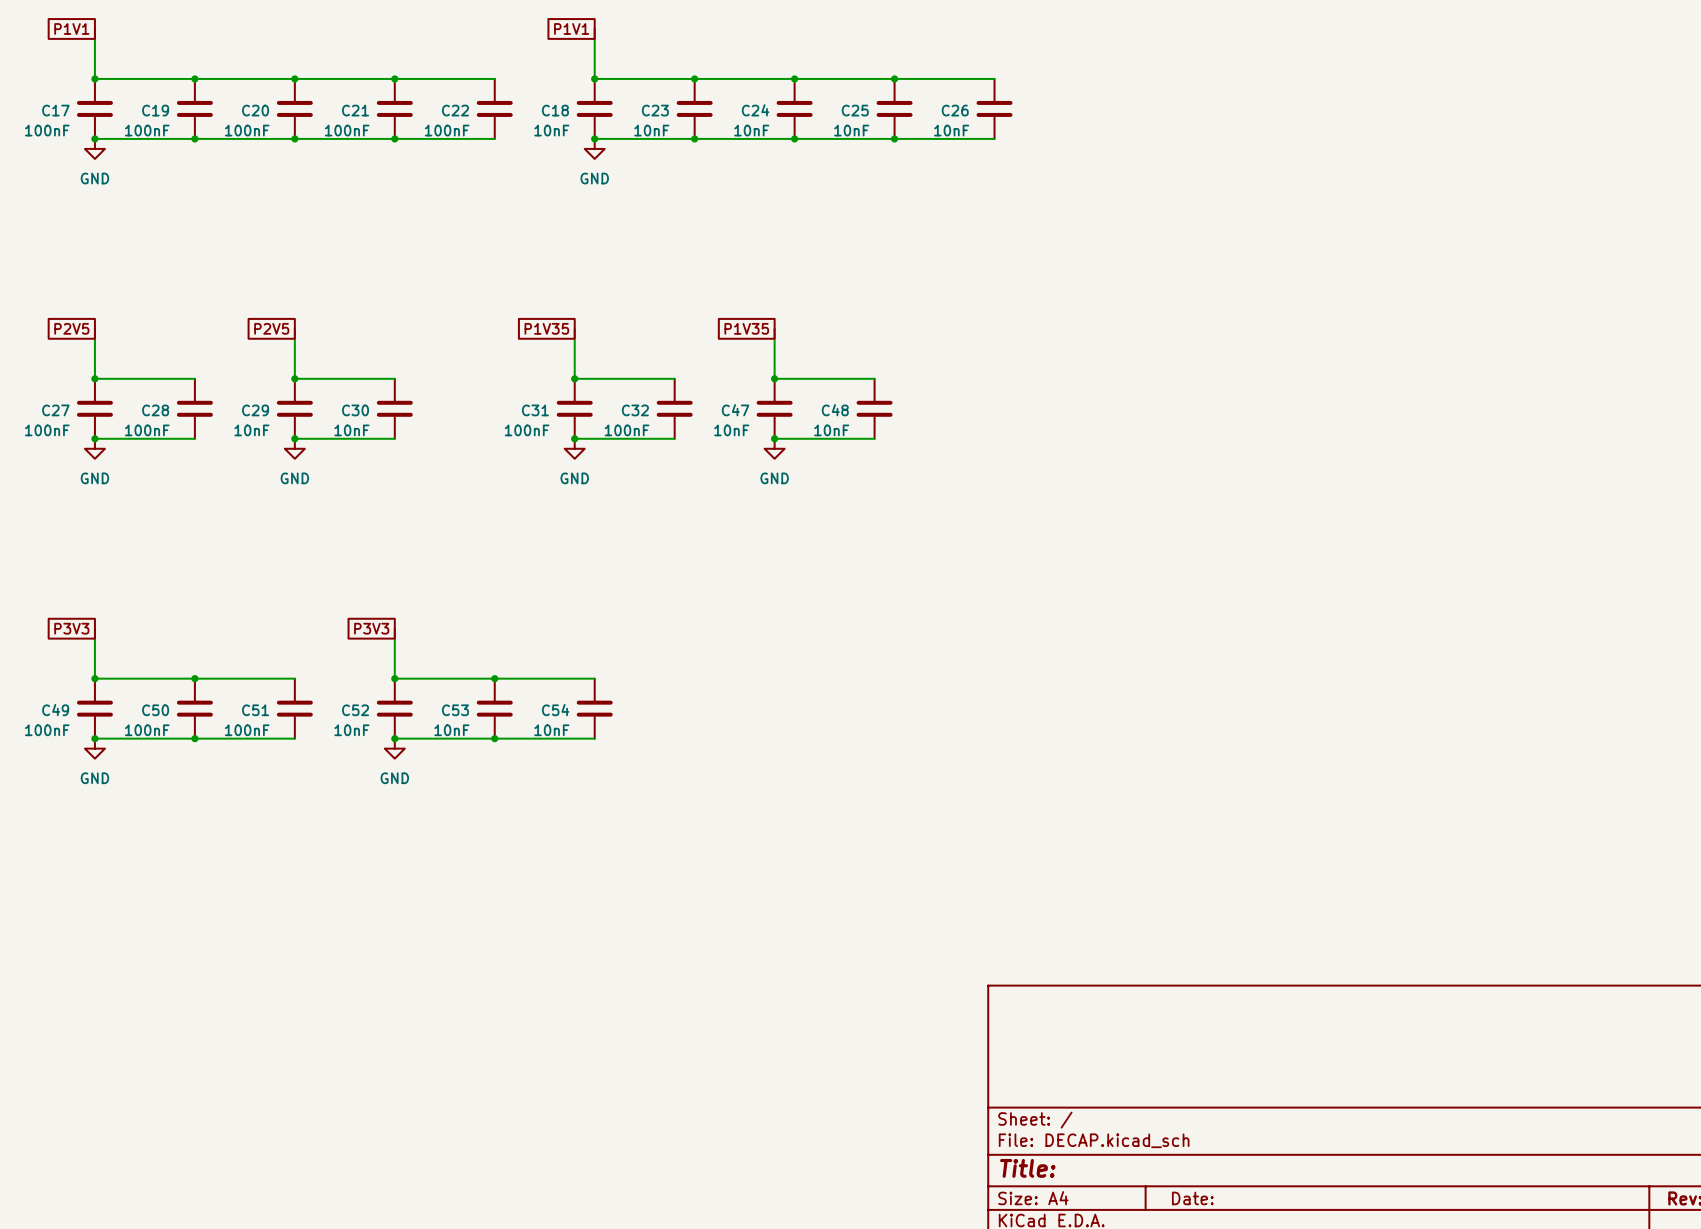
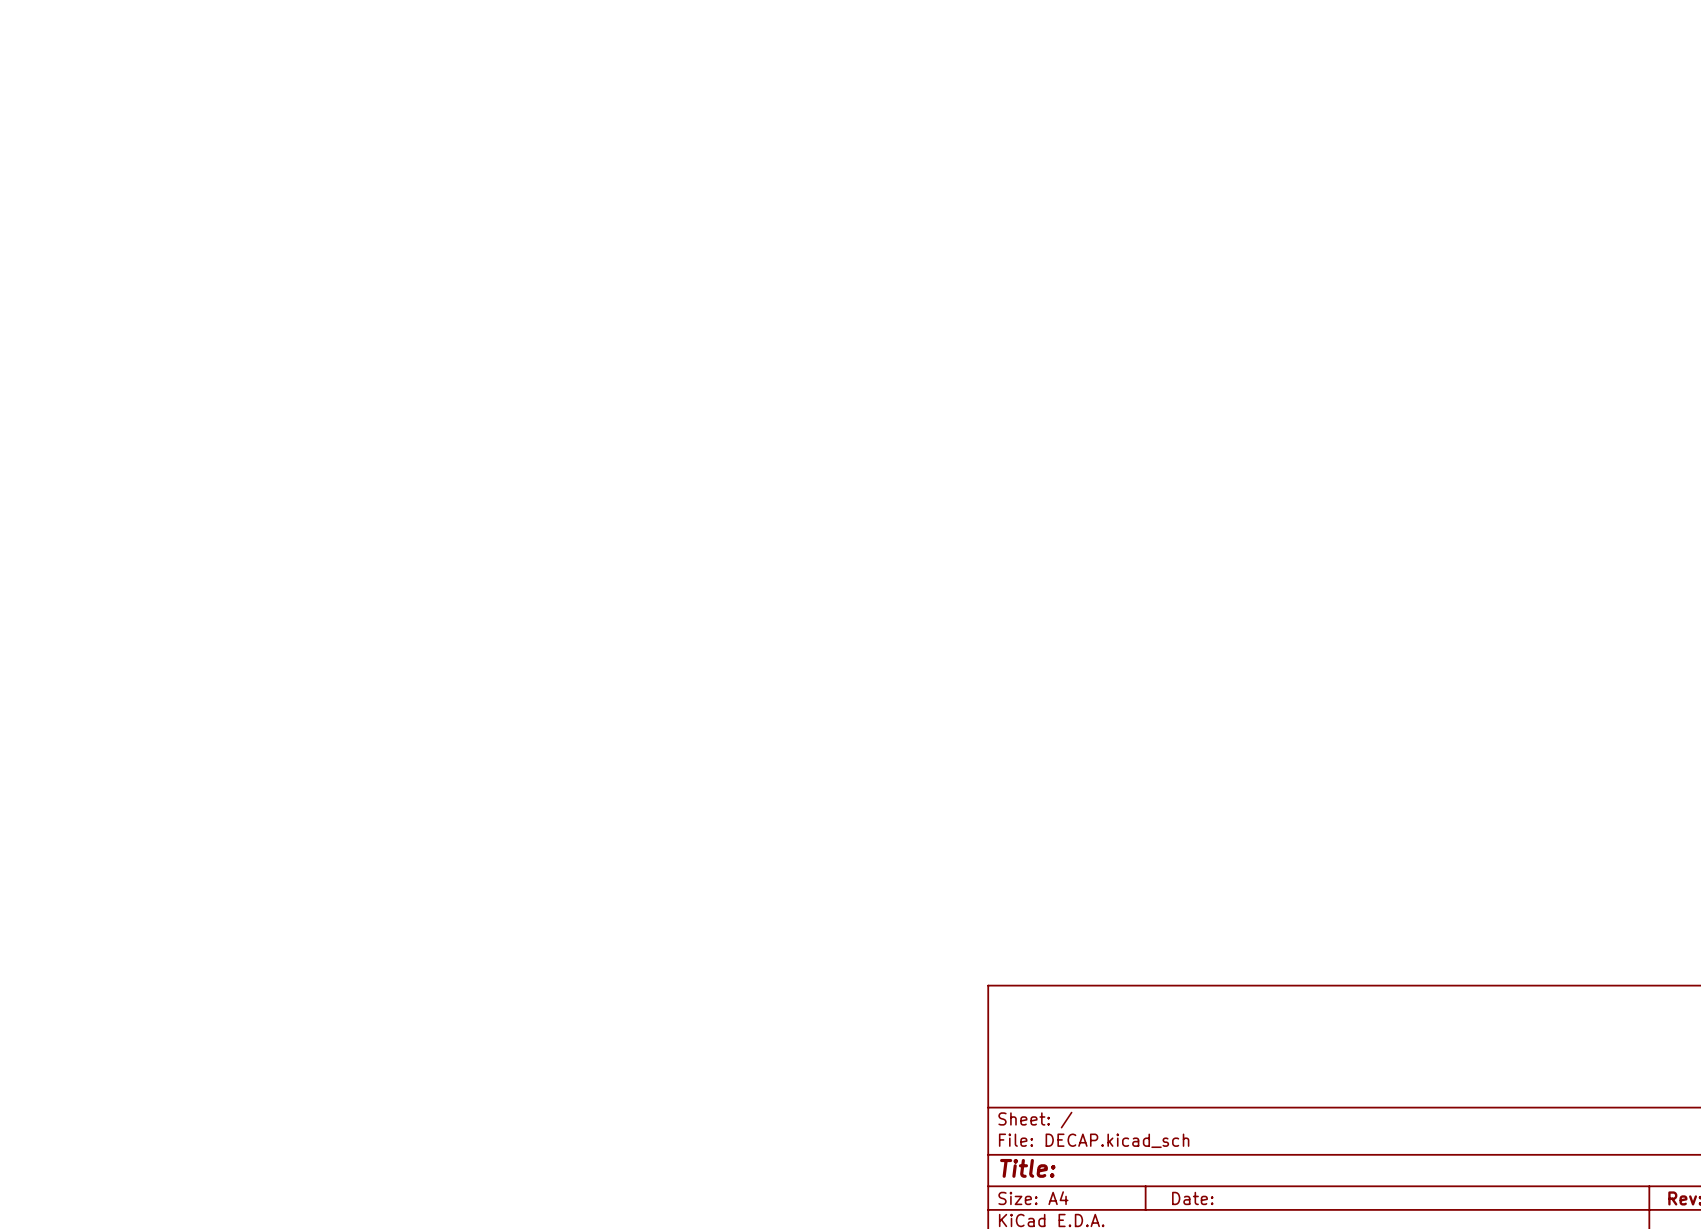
global label: P1V1 (71, 28) -> none
wire: (94, 28) (94, 78) (494, 78) -> none
global label: P1V1 (571, 28) -> none
wire: (594, 28) (594, 78) (994, 78) -> none
junction: (94, 78) -> none
junction: (194, 78) -> none
junction: (294, 78) -> none
junction: (394, 78) -> none
junction: (594, 78) -> none
junction: (694, 78) -> none
junction: (794, 78) -> none
junction: (894, 78) -> none
C17: 100nF (94, 108) -> none
C19: 100nF (194, 108) -> none
C20: 100nF (294, 108) -> none
C21: 100nF (394, 108) -> none
C22: 100nF (494, 108) -> none
C18: 10nF (594, 108) -> none
C23: 10nF (694, 108) -> none
C24: 10nF (794, 108) -> none
C25: 10nF (894, 108) -> none
C26: 10nF (994, 108) -> none
wire: (94, 138) (494, 138) -> none
junction: (94, 138) -> none
junction: (194, 138) -> none
junction: (294, 138) -> none
junction: (394, 138) -> none
wire: (594, 138) (994, 138) -> none
junction: (594, 138) -> none
junction: (694, 138) -> none
junction: (794, 138) -> none
junction: (894, 138) -> none
power symbol: GND (94, 148) -> none
power symbol: GND (594, 148) -> none
global label: P2V5 (71, 328) -> none
wire: (94, 328) (94, 378) (194, 378) -> none
global label: P2V5 (271, 328) -> none
wire: (294, 328) (294, 378) (394, 378) -> none
global label: P1V35 (546, 328) -> none
wire: (574, 328) (574, 378) (674, 378) -> none
global label: P1V35 (746, 328) -> none
wire: (774, 328) (774, 378) (874, 378) -> none
junction: (94, 378) -> none
junction: (294, 378) -> none
junction: (574, 378) -> none
junction: (774, 378) -> none
C27: 100nF (94, 408) -> none
C28: 100nF (194, 408) -> none
C29: 10nF (294, 408) -> none
C30: 10nF (394, 408) -> none
C31: 100nF (574, 408) -> none
C32: 100nF (674, 408) -> none
C47: 10nF (774, 408) -> none
C48: 10nF (874, 408) -> none
wire: (94, 438) (194, 438) -> none
junction: (94, 438) -> none
wire: (294, 438) (394, 438) -> none
junction: (294, 438) -> none
wire: (574, 438) (674, 438) -> none
junction: (574, 438) -> none
wire: (774, 438) (874, 438) -> none
junction: (774, 438) -> none
power symbol: GND (94, 448) -> none
power symbol: GND (294, 448) -> none
power symbol: GND (574, 448) -> none
power symbol: GND (774, 448) -> none
global label: P3V3 (71, 628) -> none
wire: (94, 628) (94, 678) (294, 678) -> none
global label: P3V3 (371, 628) -> none
wire: (394, 628) (394, 678) (594, 678) -> none
junction: (94, 678) -> none
junction: (194, 678) -> none
junction: (394, 678) -> none
junction: (494, 678) -> none
C49: 100nF (94, 708) -> none
C50: 100nF (194, 708) -> none
C51: 100nF (294, 708) -> none
C52: 10nF (394, 708) -> none
C53: 10nF (494, 708) -> none
C54: 10nF (594, 708) -> none
wire: (94, 738) (294, 738) -> none
junction: (94, 738) -> none
junction: (194, 738) -> none
wire: (394, 738) (594, 738) -> none
junction: (394, 738) -> none
junction: (494, 738) -> none
power symbol: GND (94, 748) -> none
power symbol: GND (394, 748) -> none

